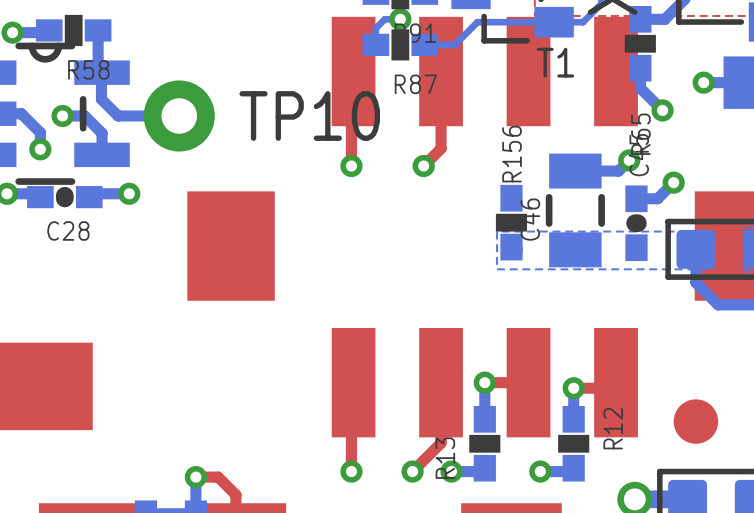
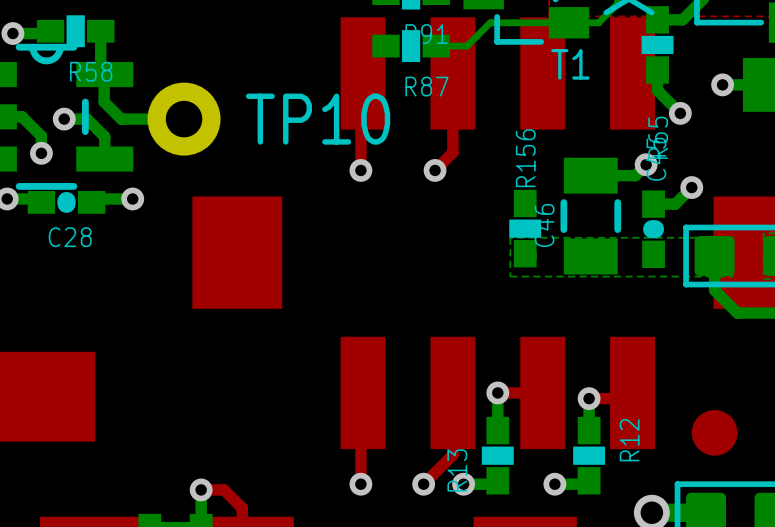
bottom track: (400, 19) (384, 19) (375, 28) (375, 44) -> none
via: (400, 19) -> none

